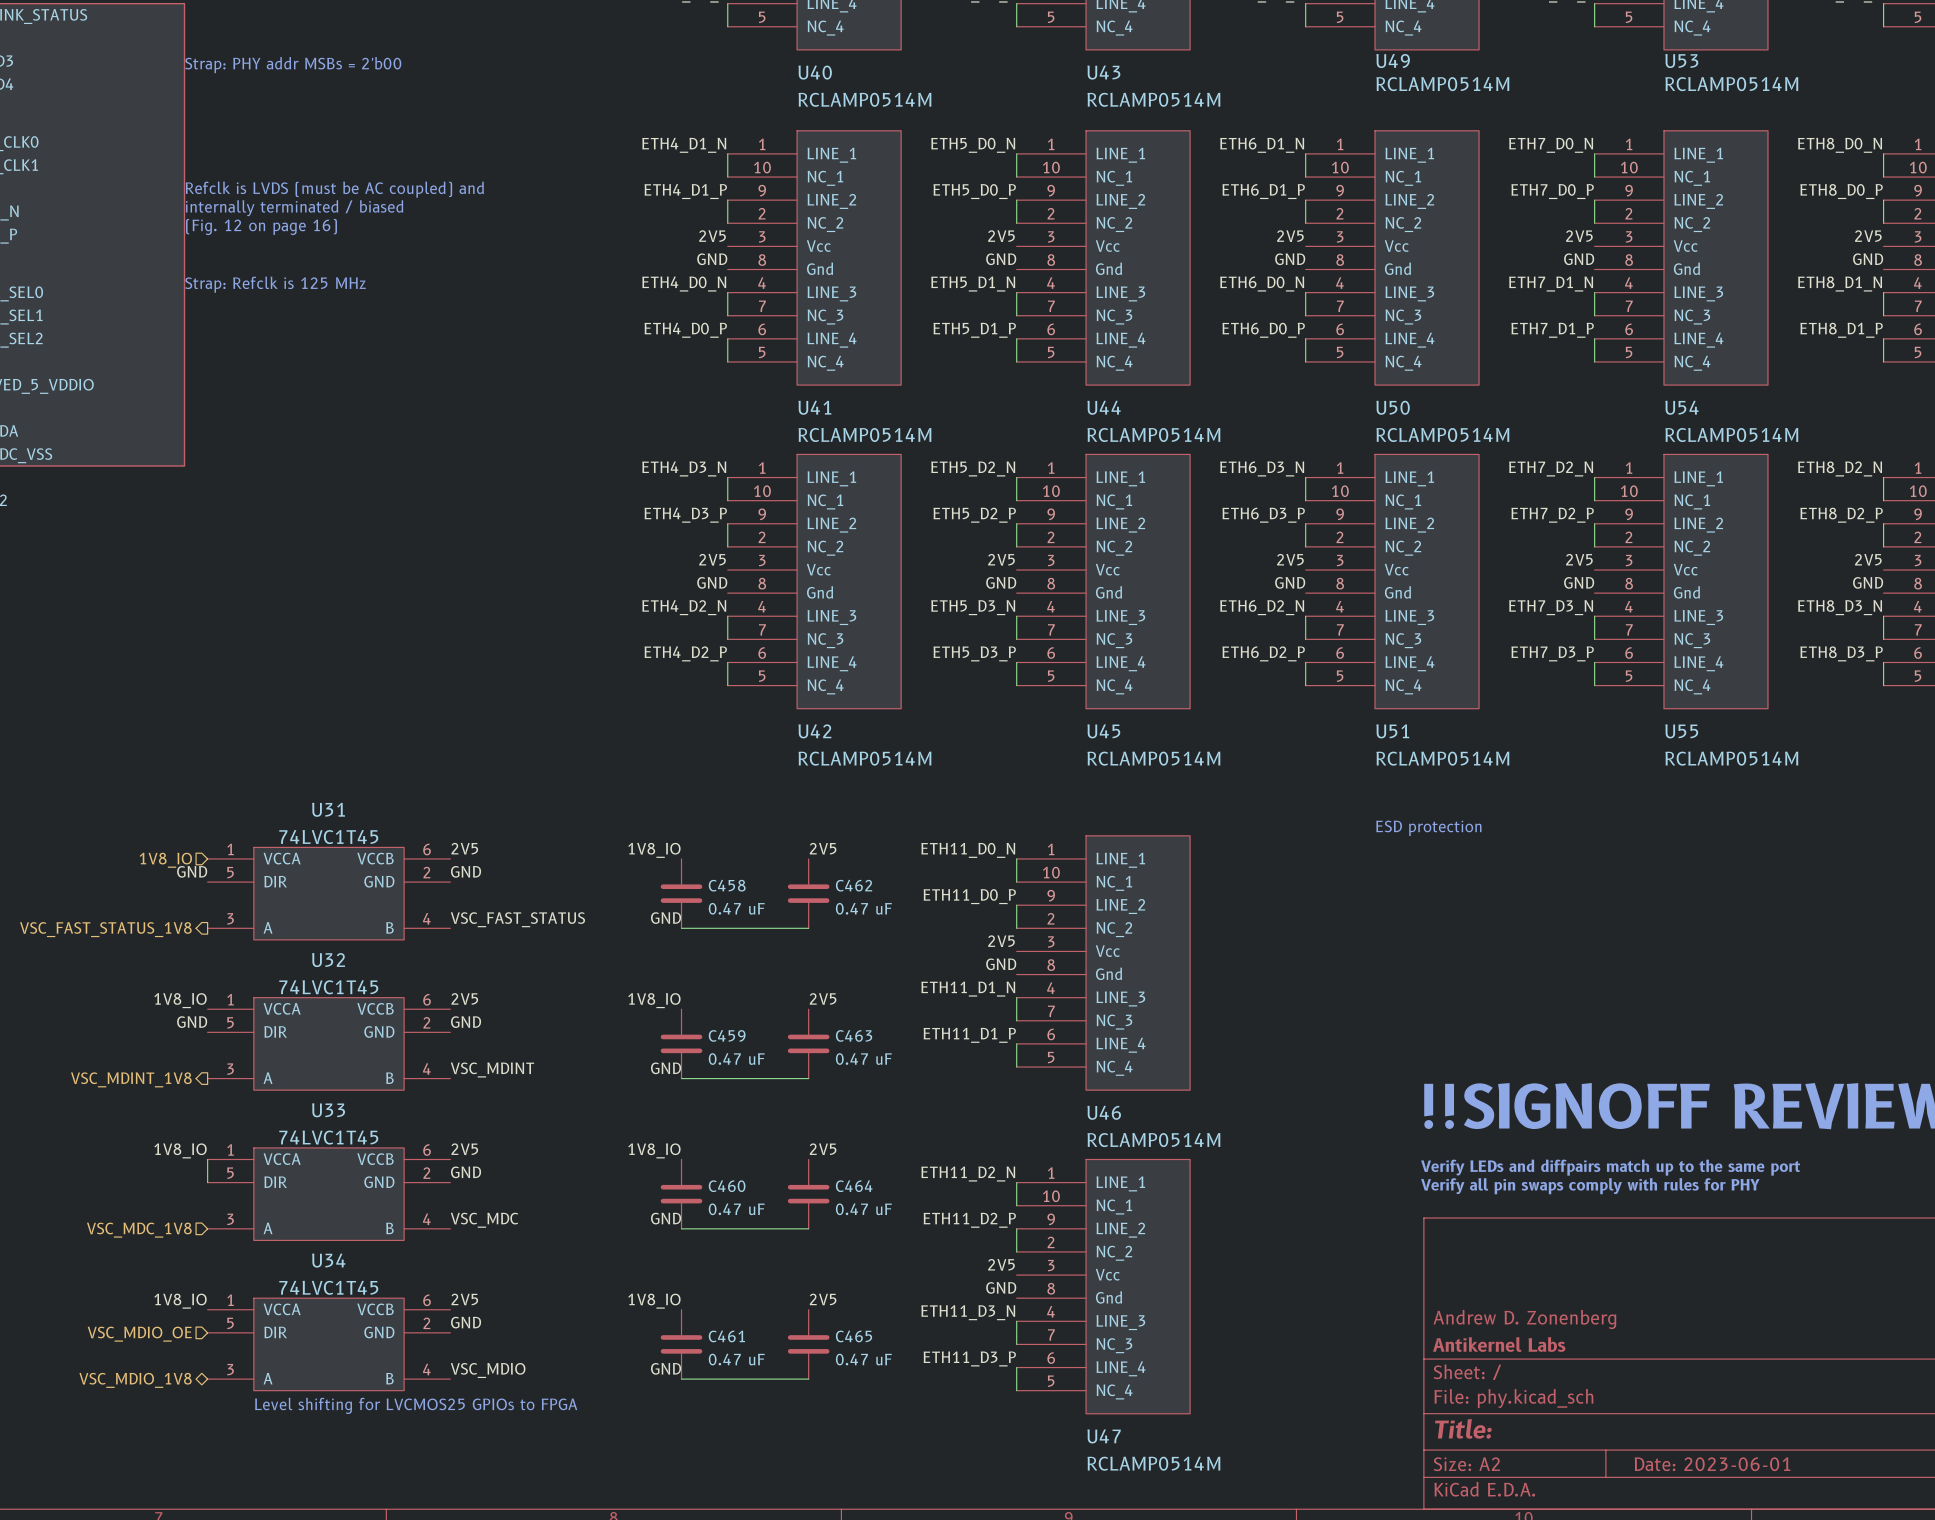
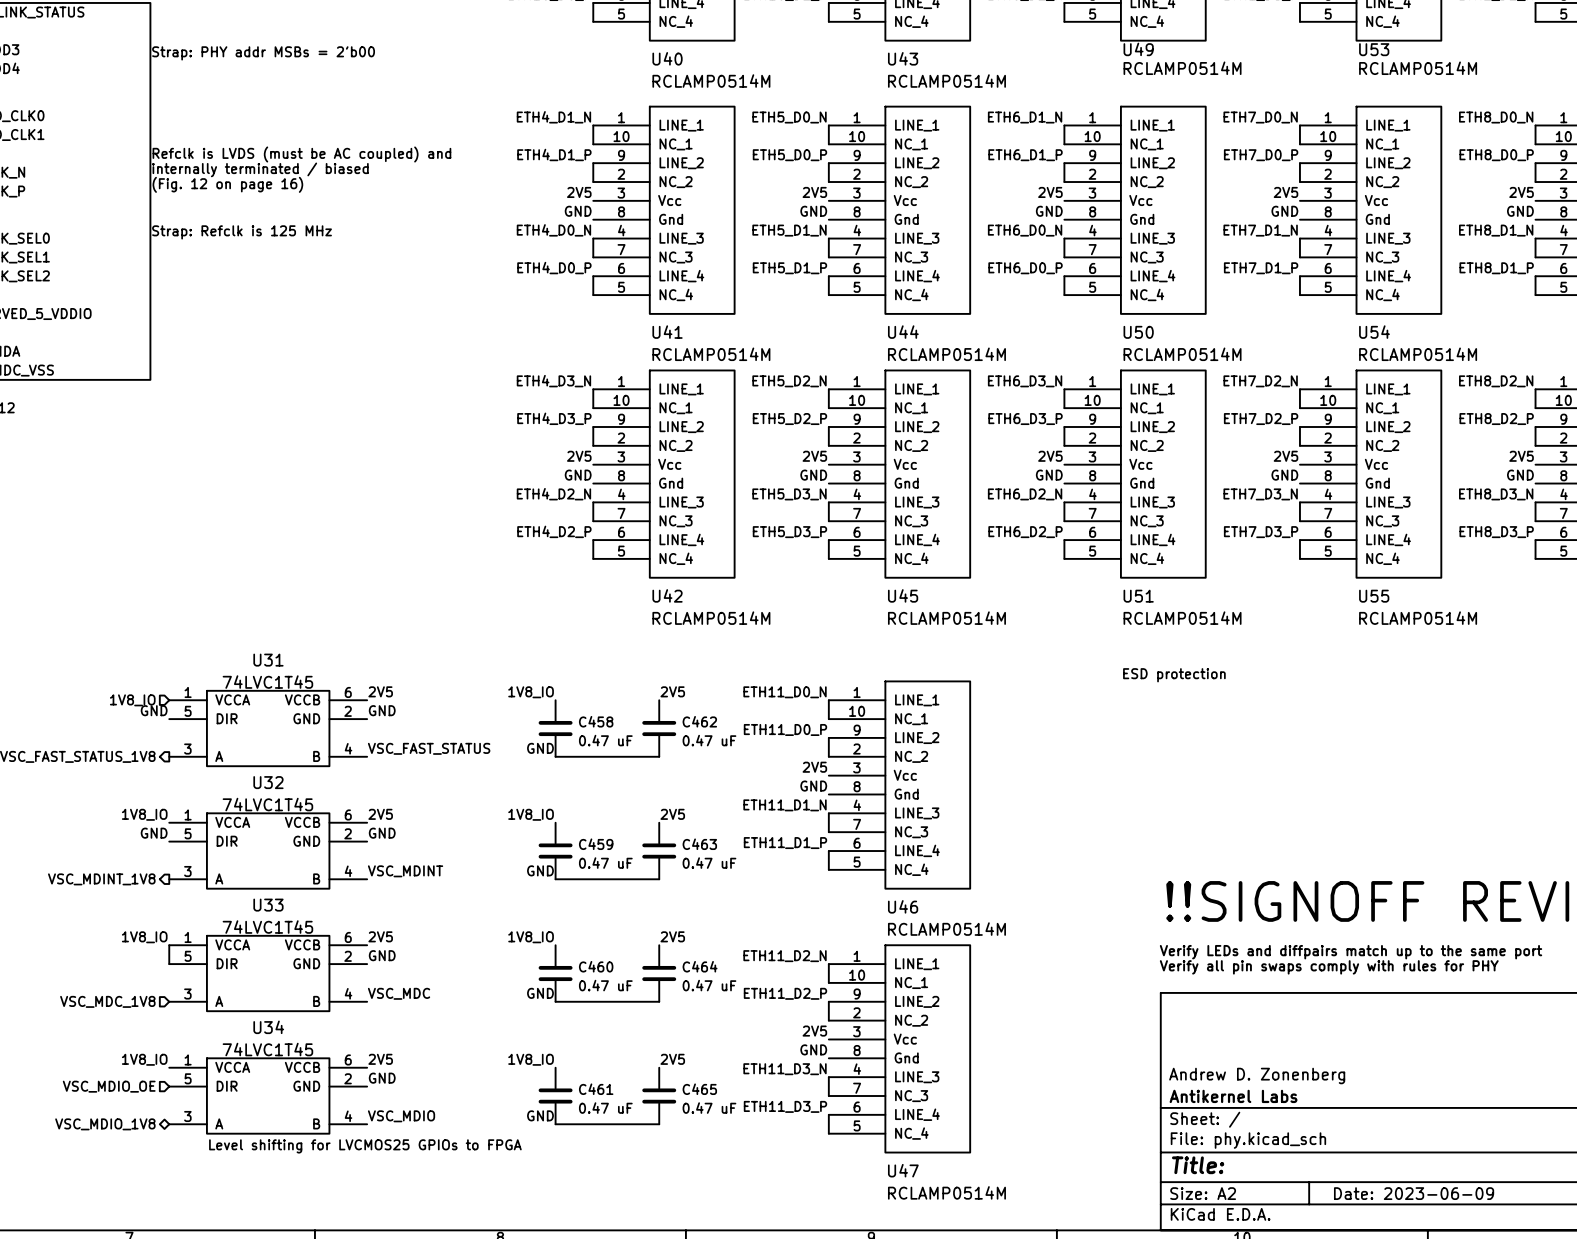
title block: Date: 2023-06-01 (1712, 1464) -> Date: 2023-06-09 (1414, 1193)

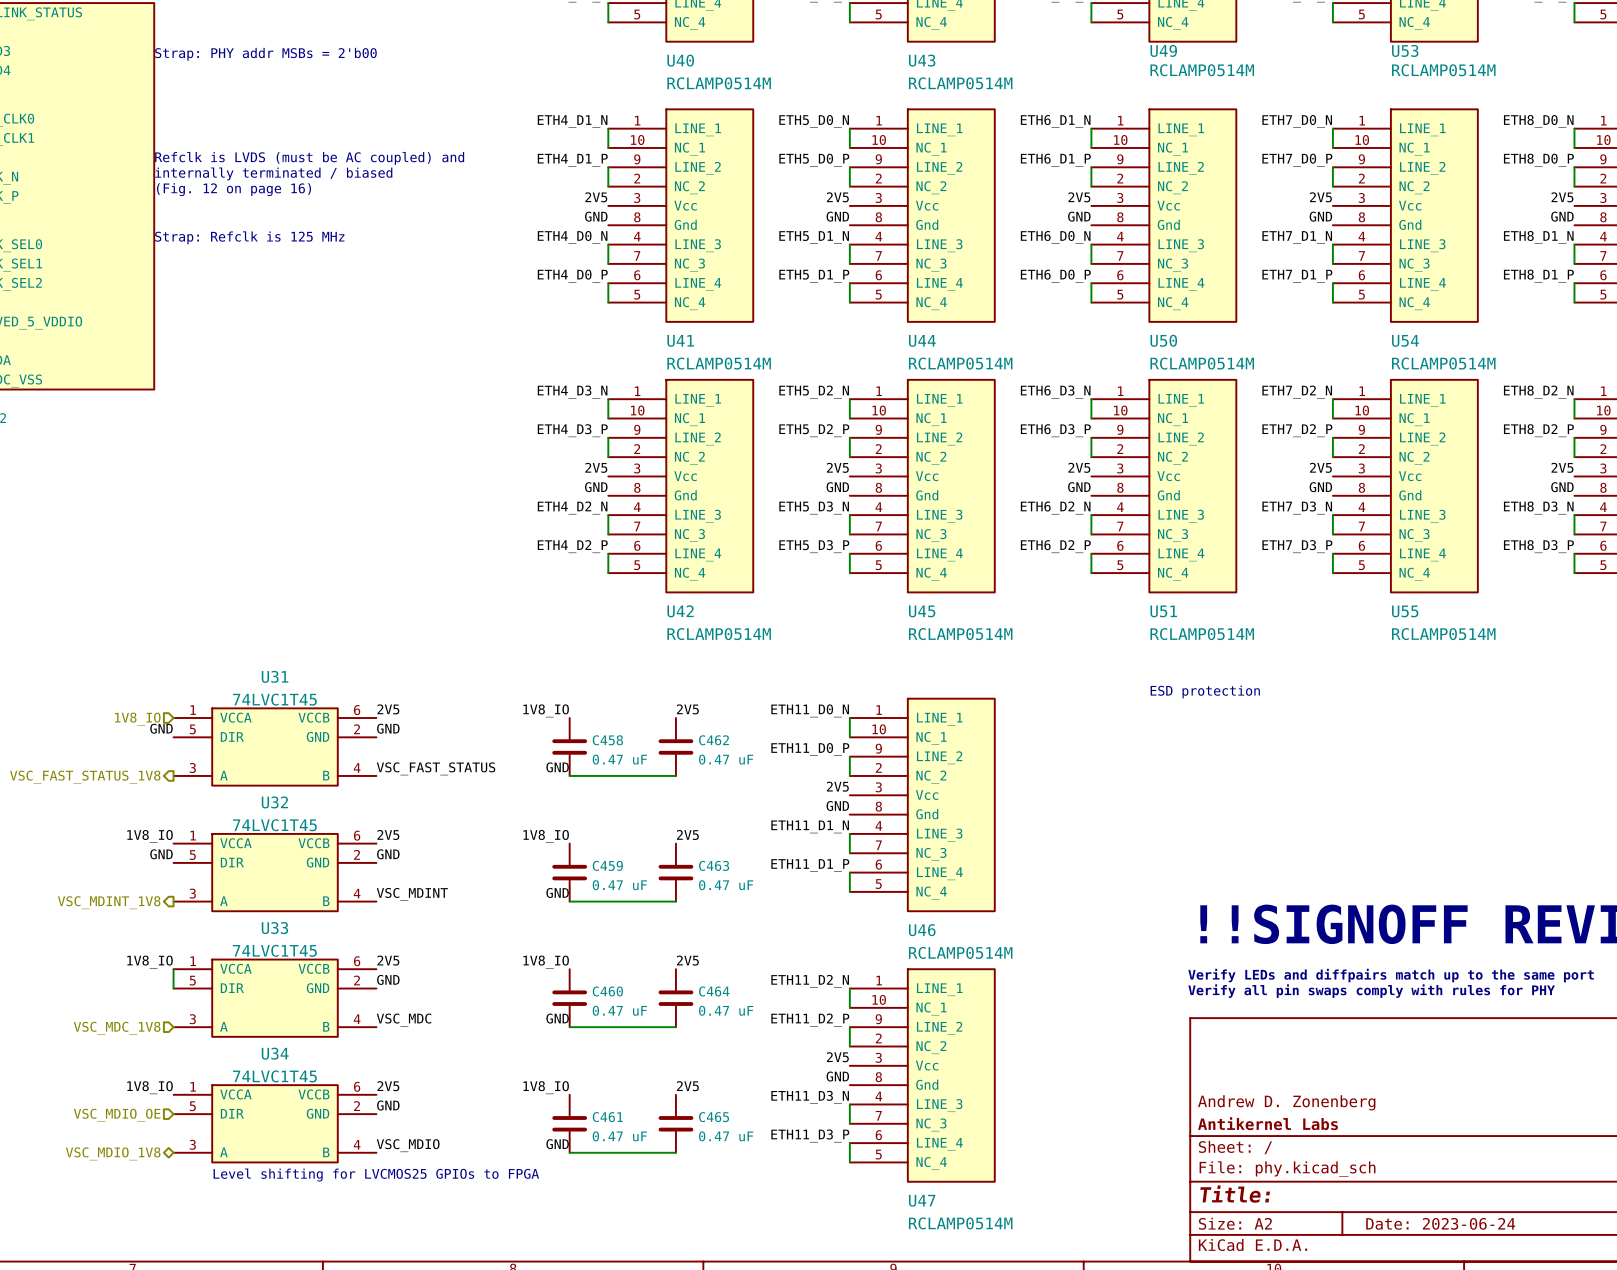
title block: Date: 2023-06-09 (1414, 1193) -> Date: 2023-06-24 (1440, 1223)

